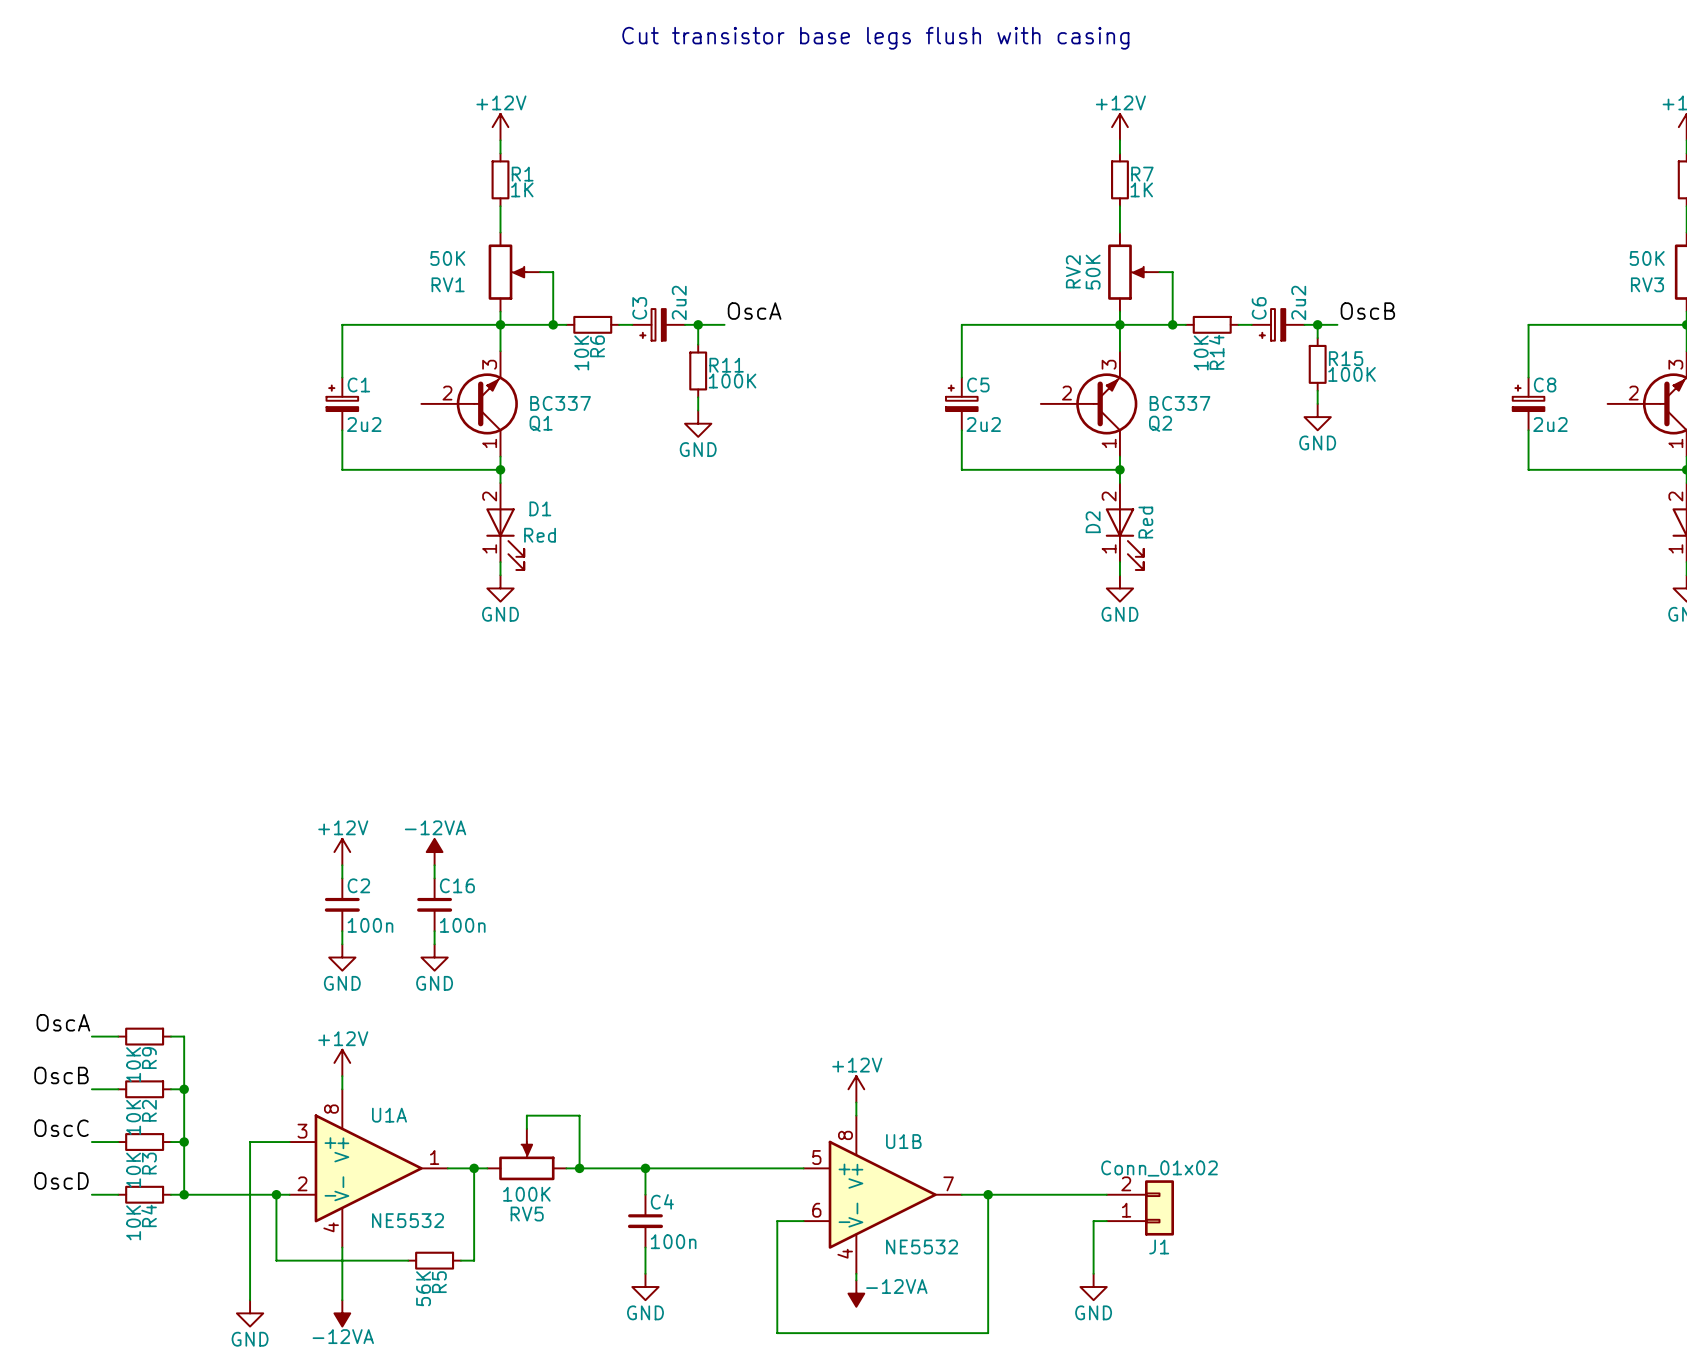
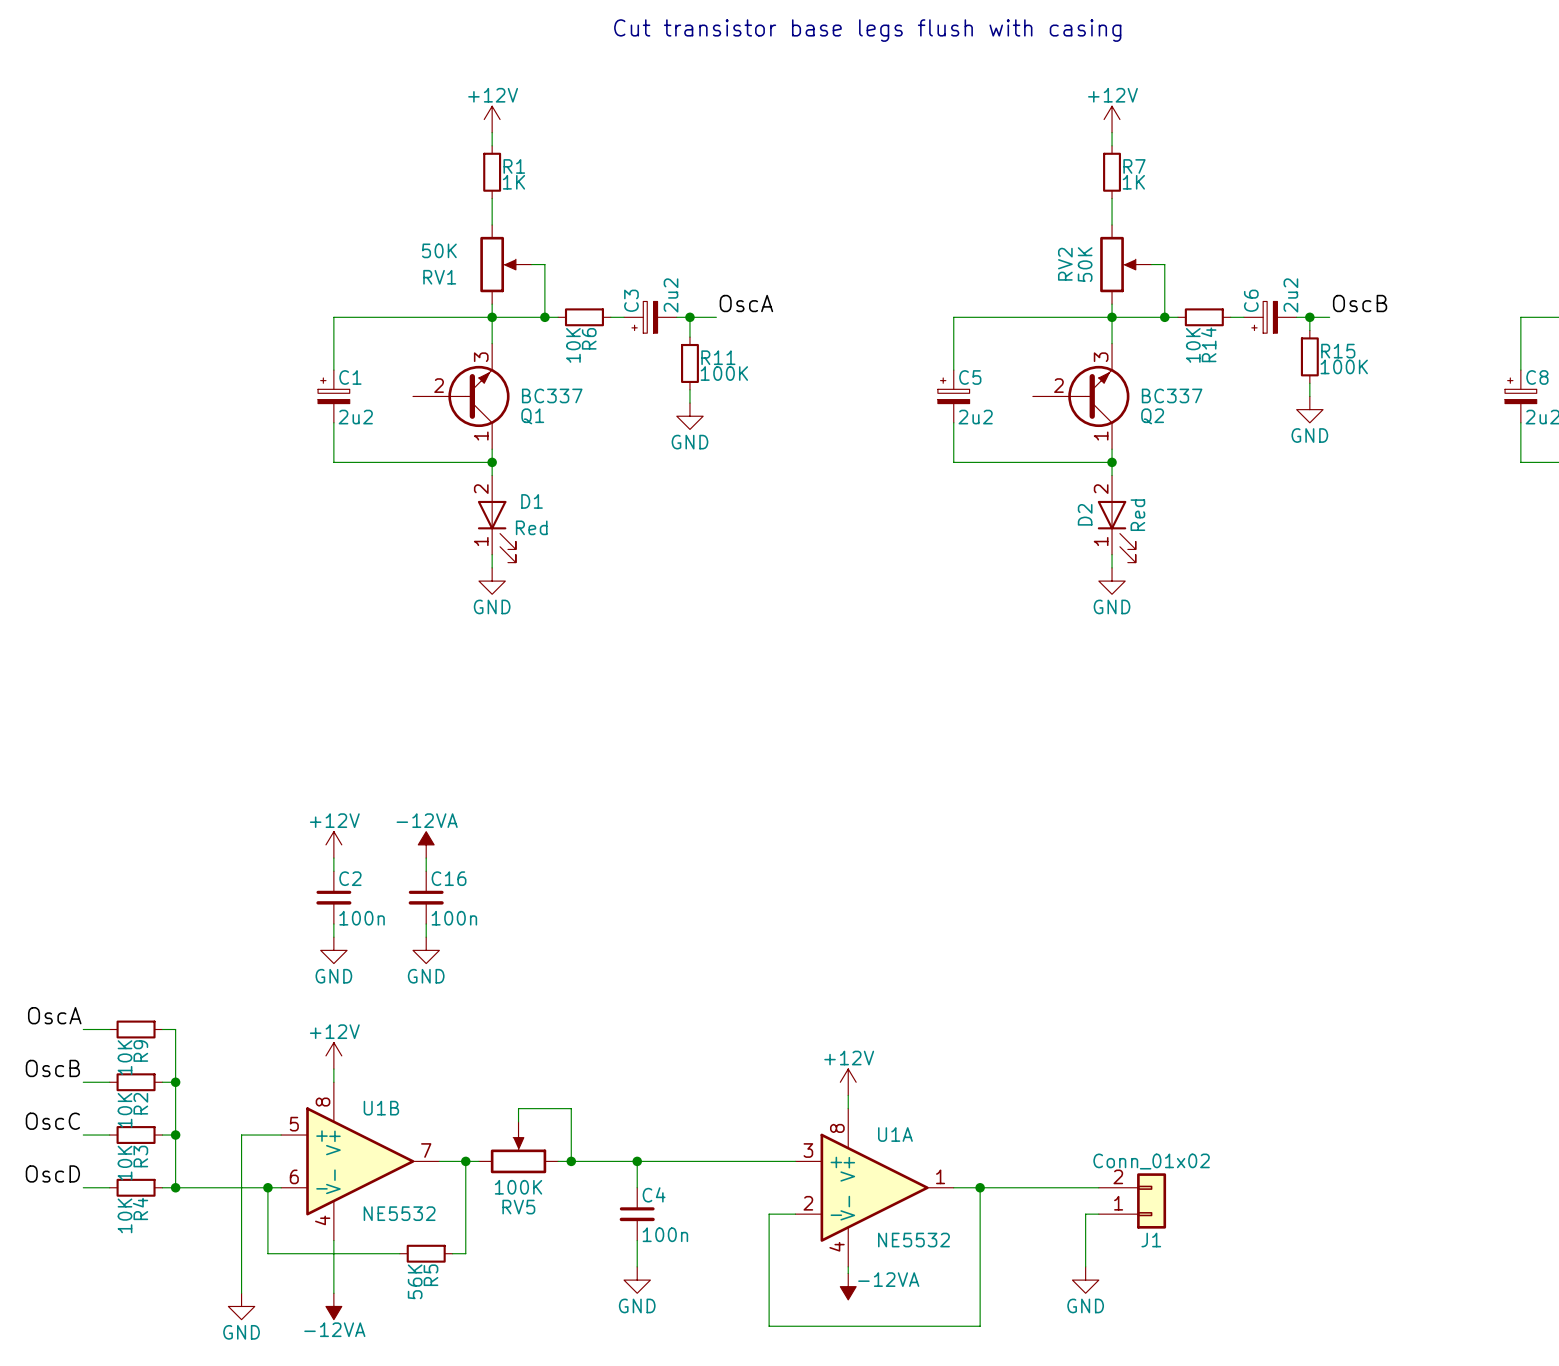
U1A position: (368, 1168) -> (874, 1187)
U1B position: (882, 1194) -> (360, 1161)

